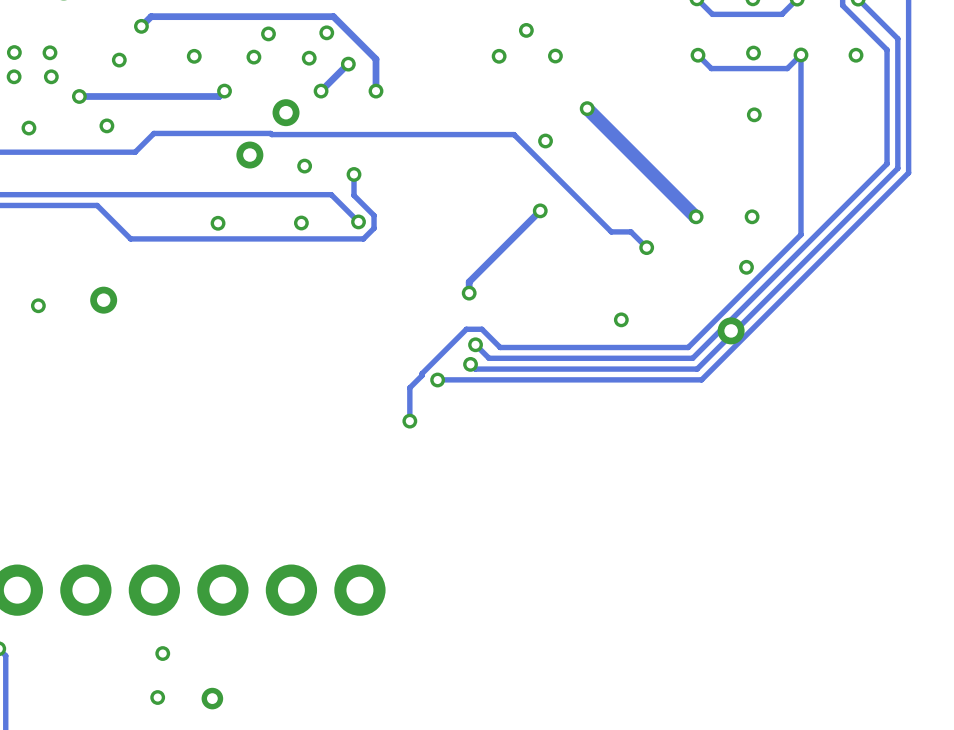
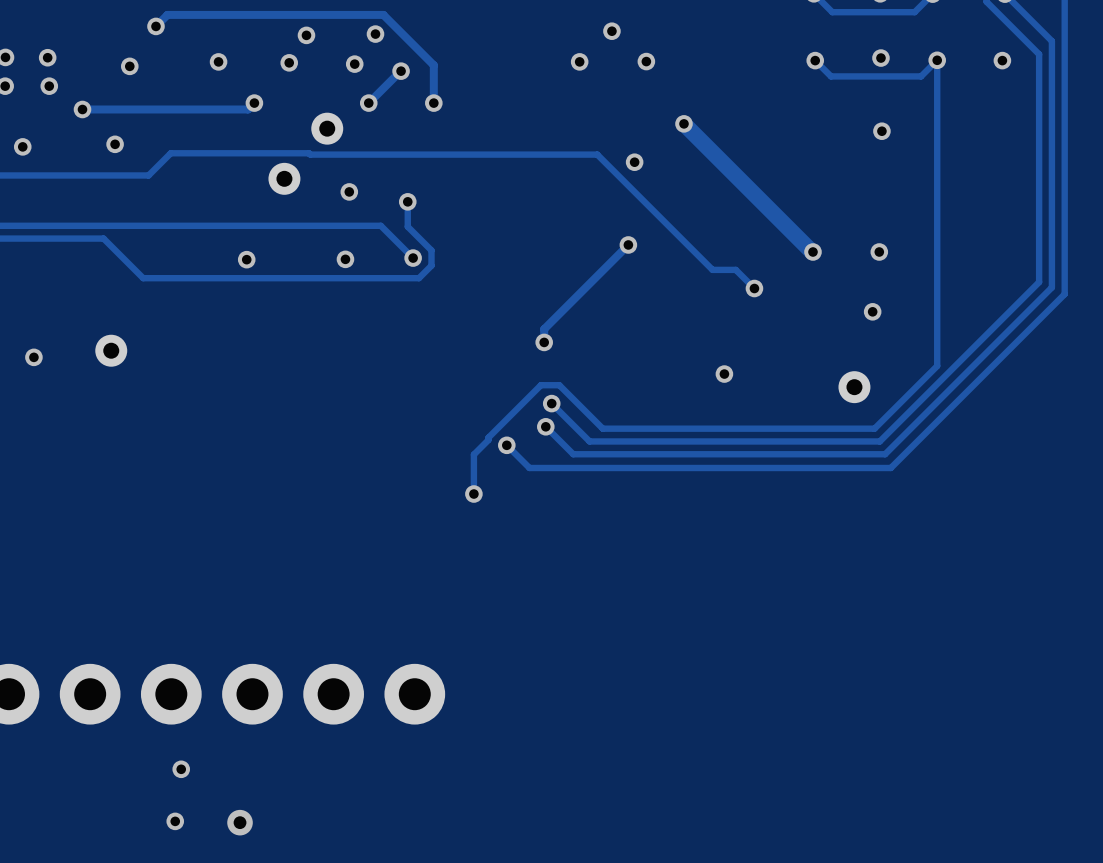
track: (887, 163) (692, 358) (489, 358) -> (1039, 189) (1039, 282) (879, 441) (589, 441) (567, 419)
track: (897, 168) (697, 369) (475, 369) -> (1051, 194) (1051, 287) (885, 454) (573, 454) (551, 432)
track: (908, 172) (701, 379) (437, 379) -> (1064, 199) (1064, 294) (890, 467) (529, 467) (506, 445)
track: (800, 234) (688, 347) (500, 347) -> (937, 273) (937, 366) (874, 428) (602, 428) (580, 406)

